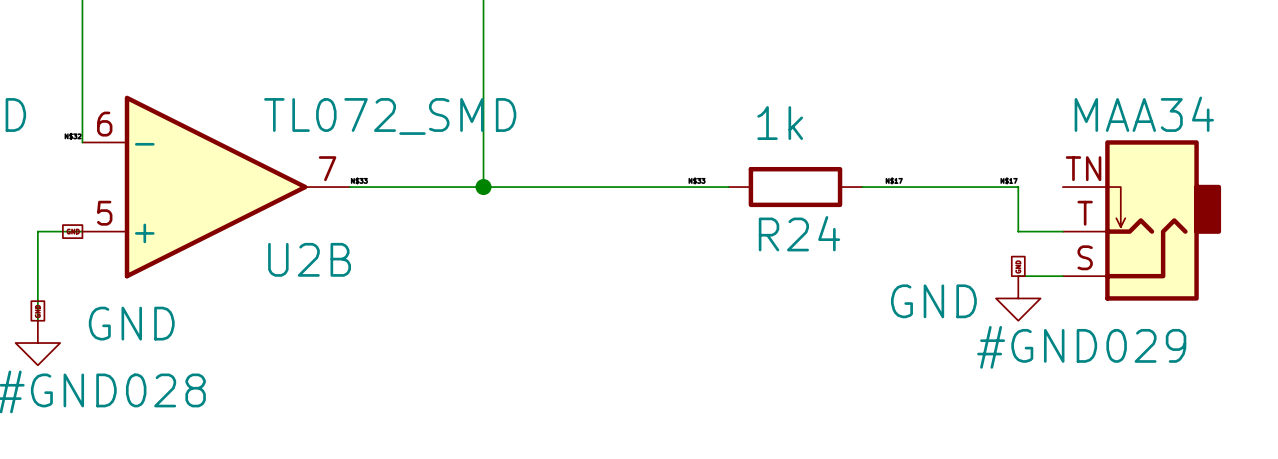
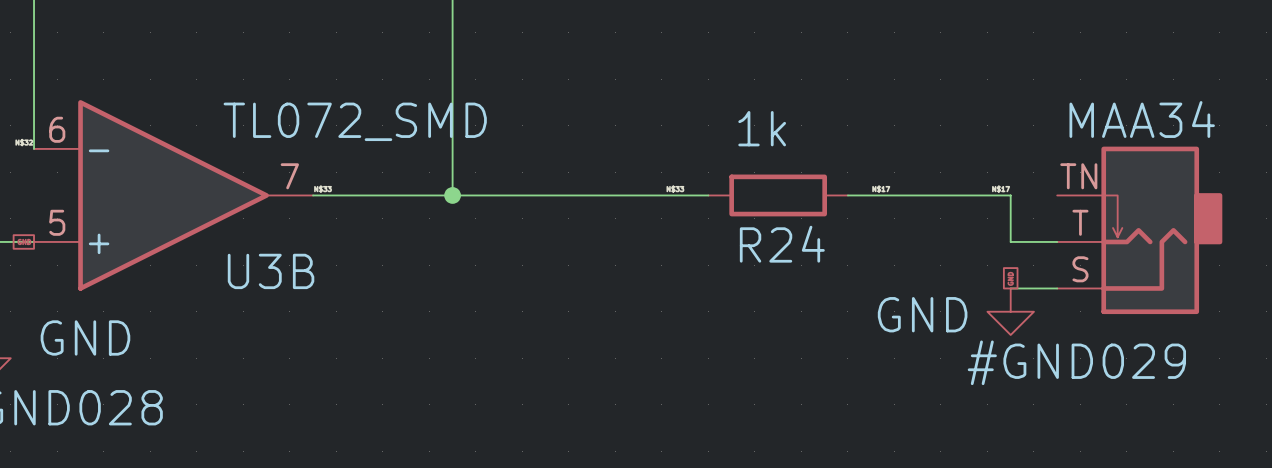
U2B name: U2B (309, 259) -> U3B (271, 271)

